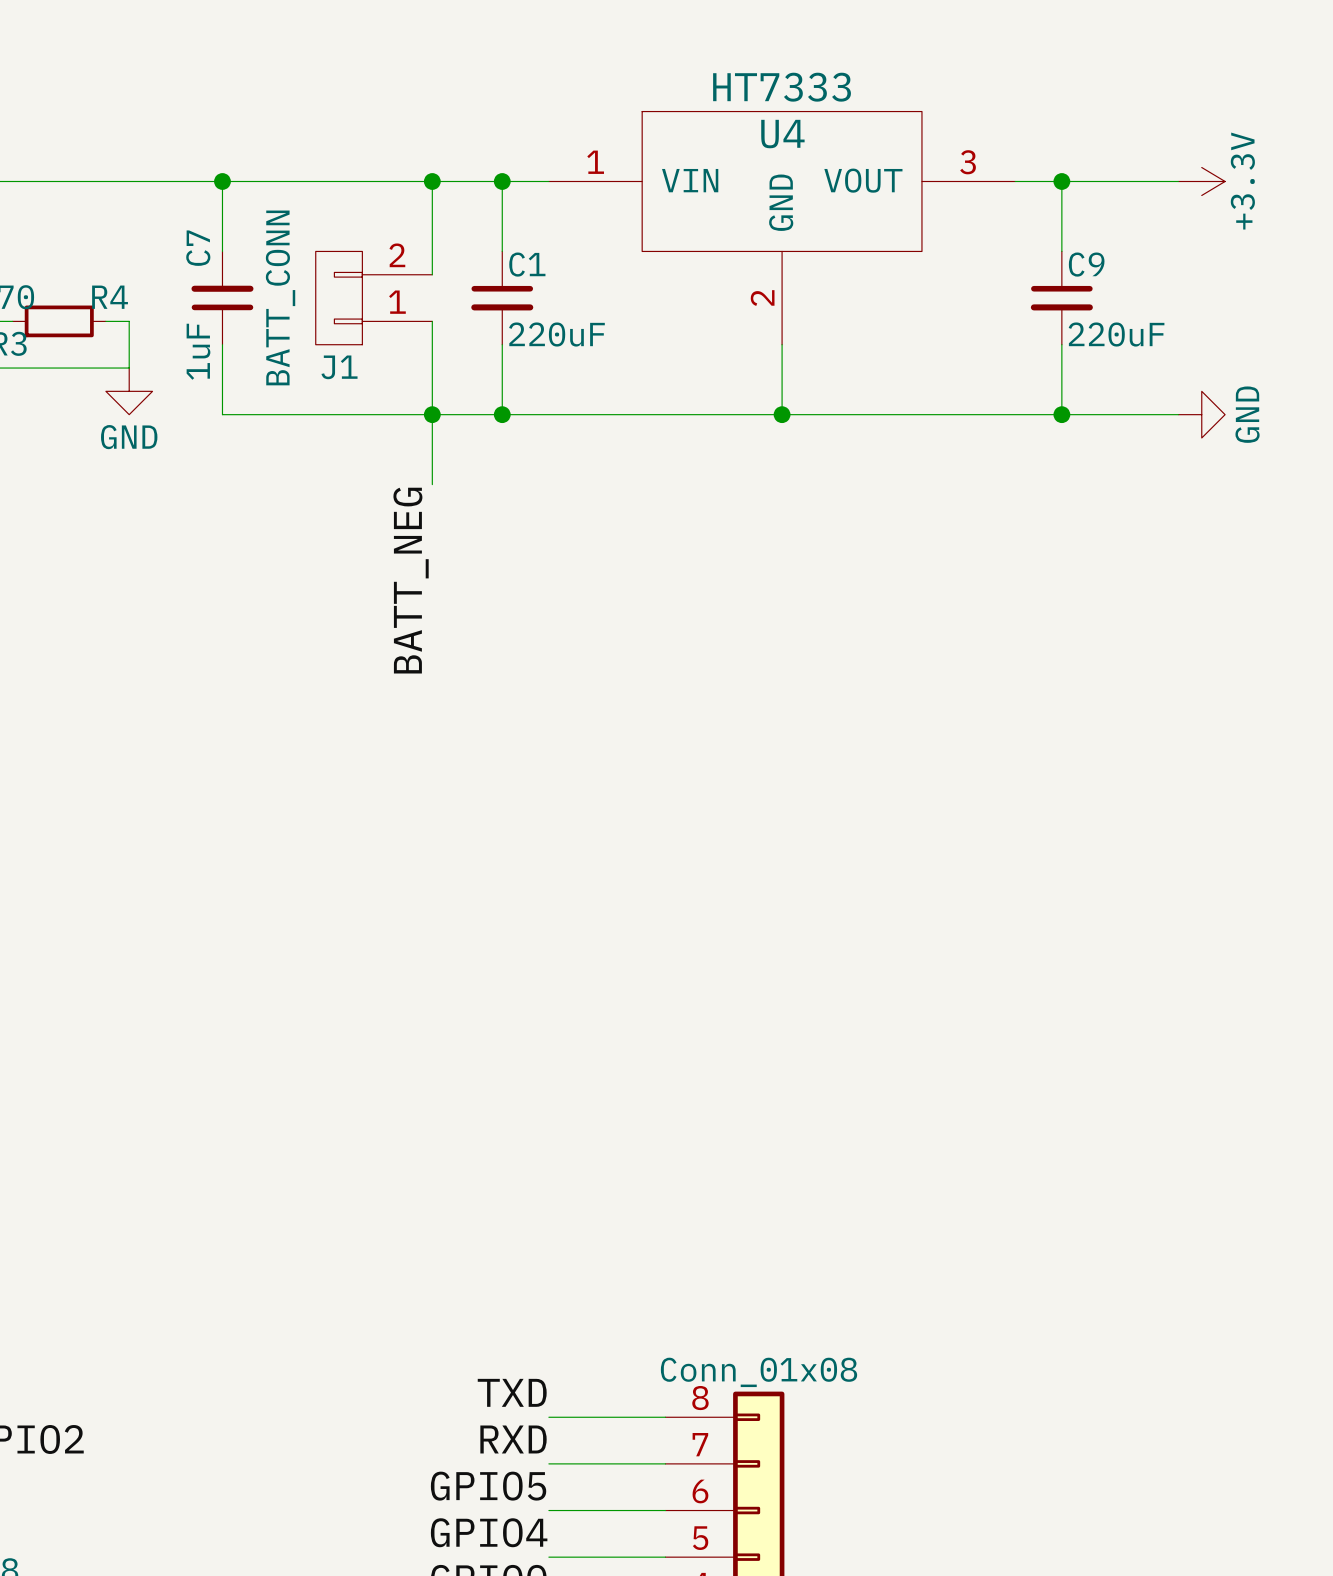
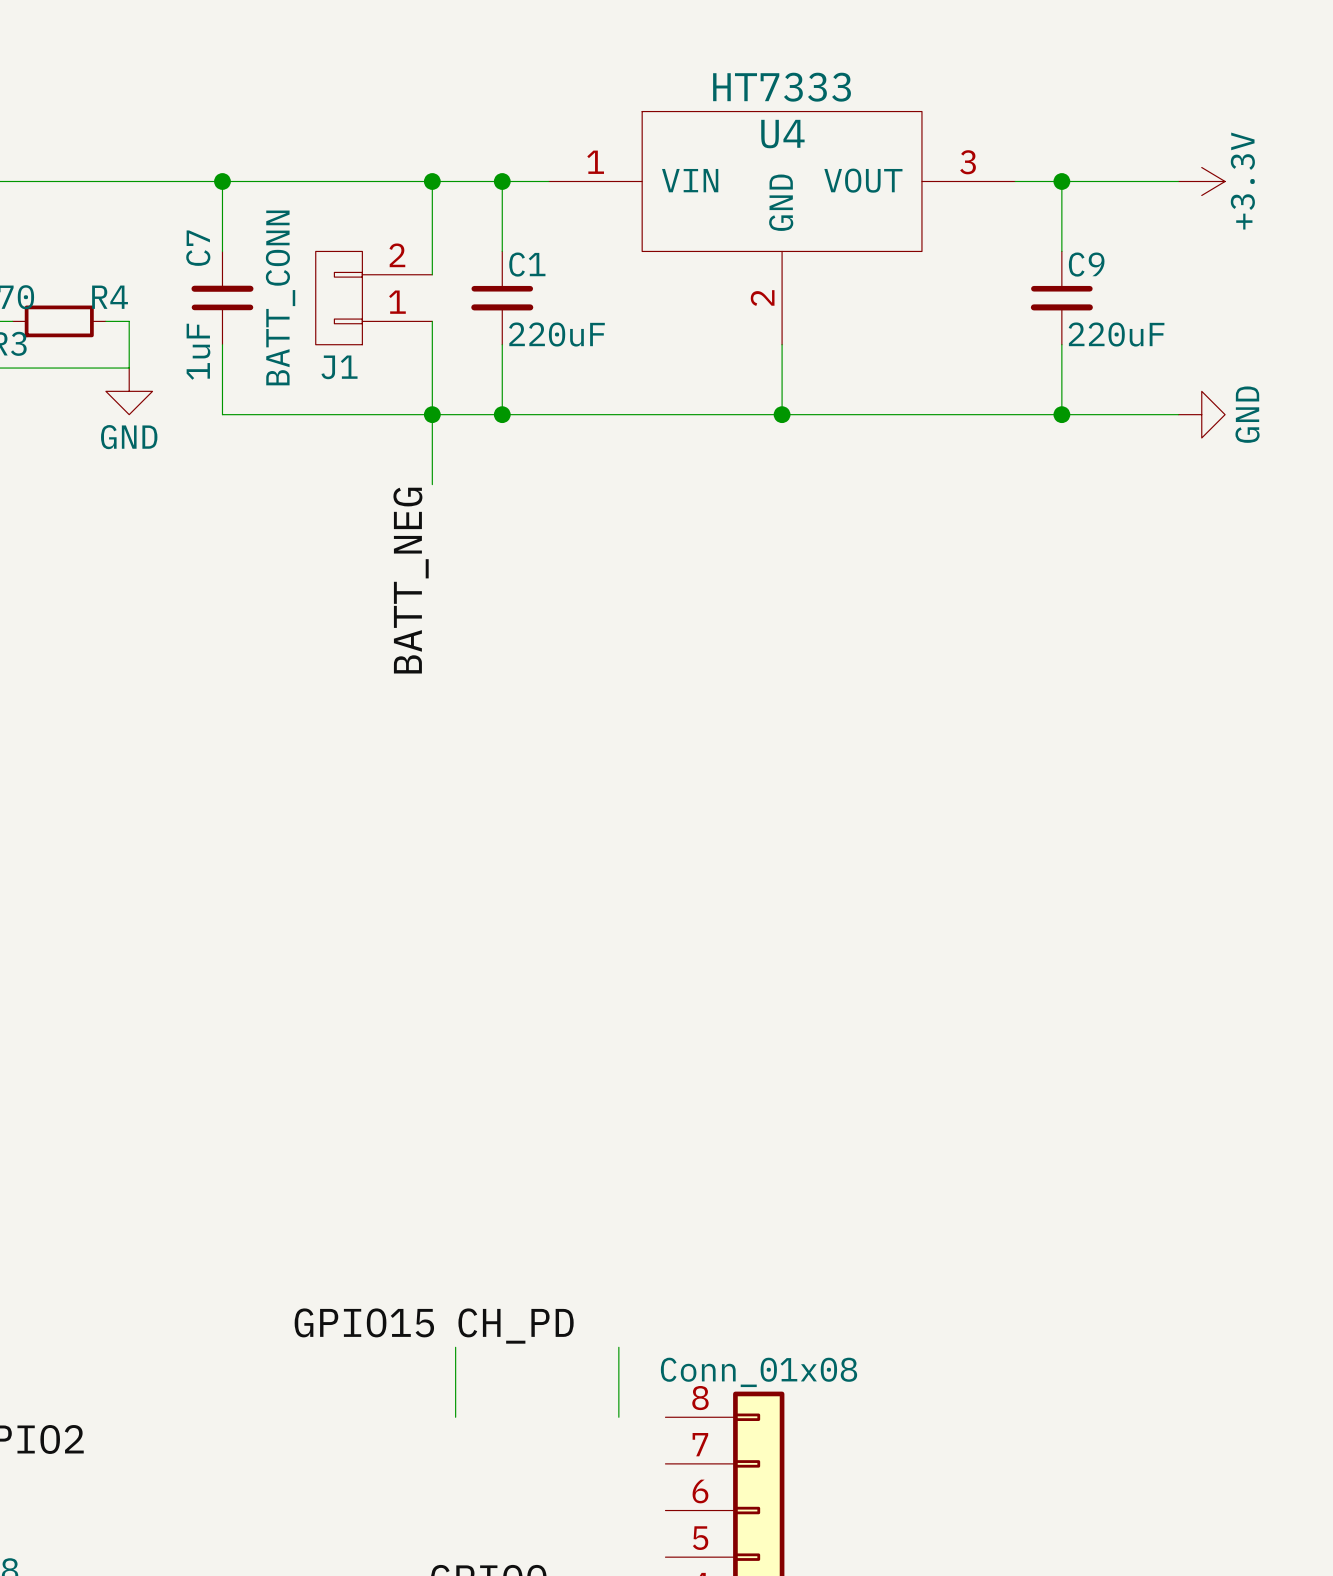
label: none -> GPIO15 (364, 1322)
label: none -> CH_PD (516, 1326)
wire: none -> (455, 1347) (455, 1417)
wire: none -> (618, 1347) (618, 1417)
label: TXD (512, 1392) -> none
wire: (548, 1417) (665, 1417) -> none
label: RXD (513, 1439) -> none
wire: (548, 1463) (665, 1463) -> none
label: GPIO5 (488, 1486) -> none
wire: (548, 1510) (665, 1510) -> none
label: GPIO4 (489, 1532) -> none
wire: (548, 1557) (665, 1557) -> none

